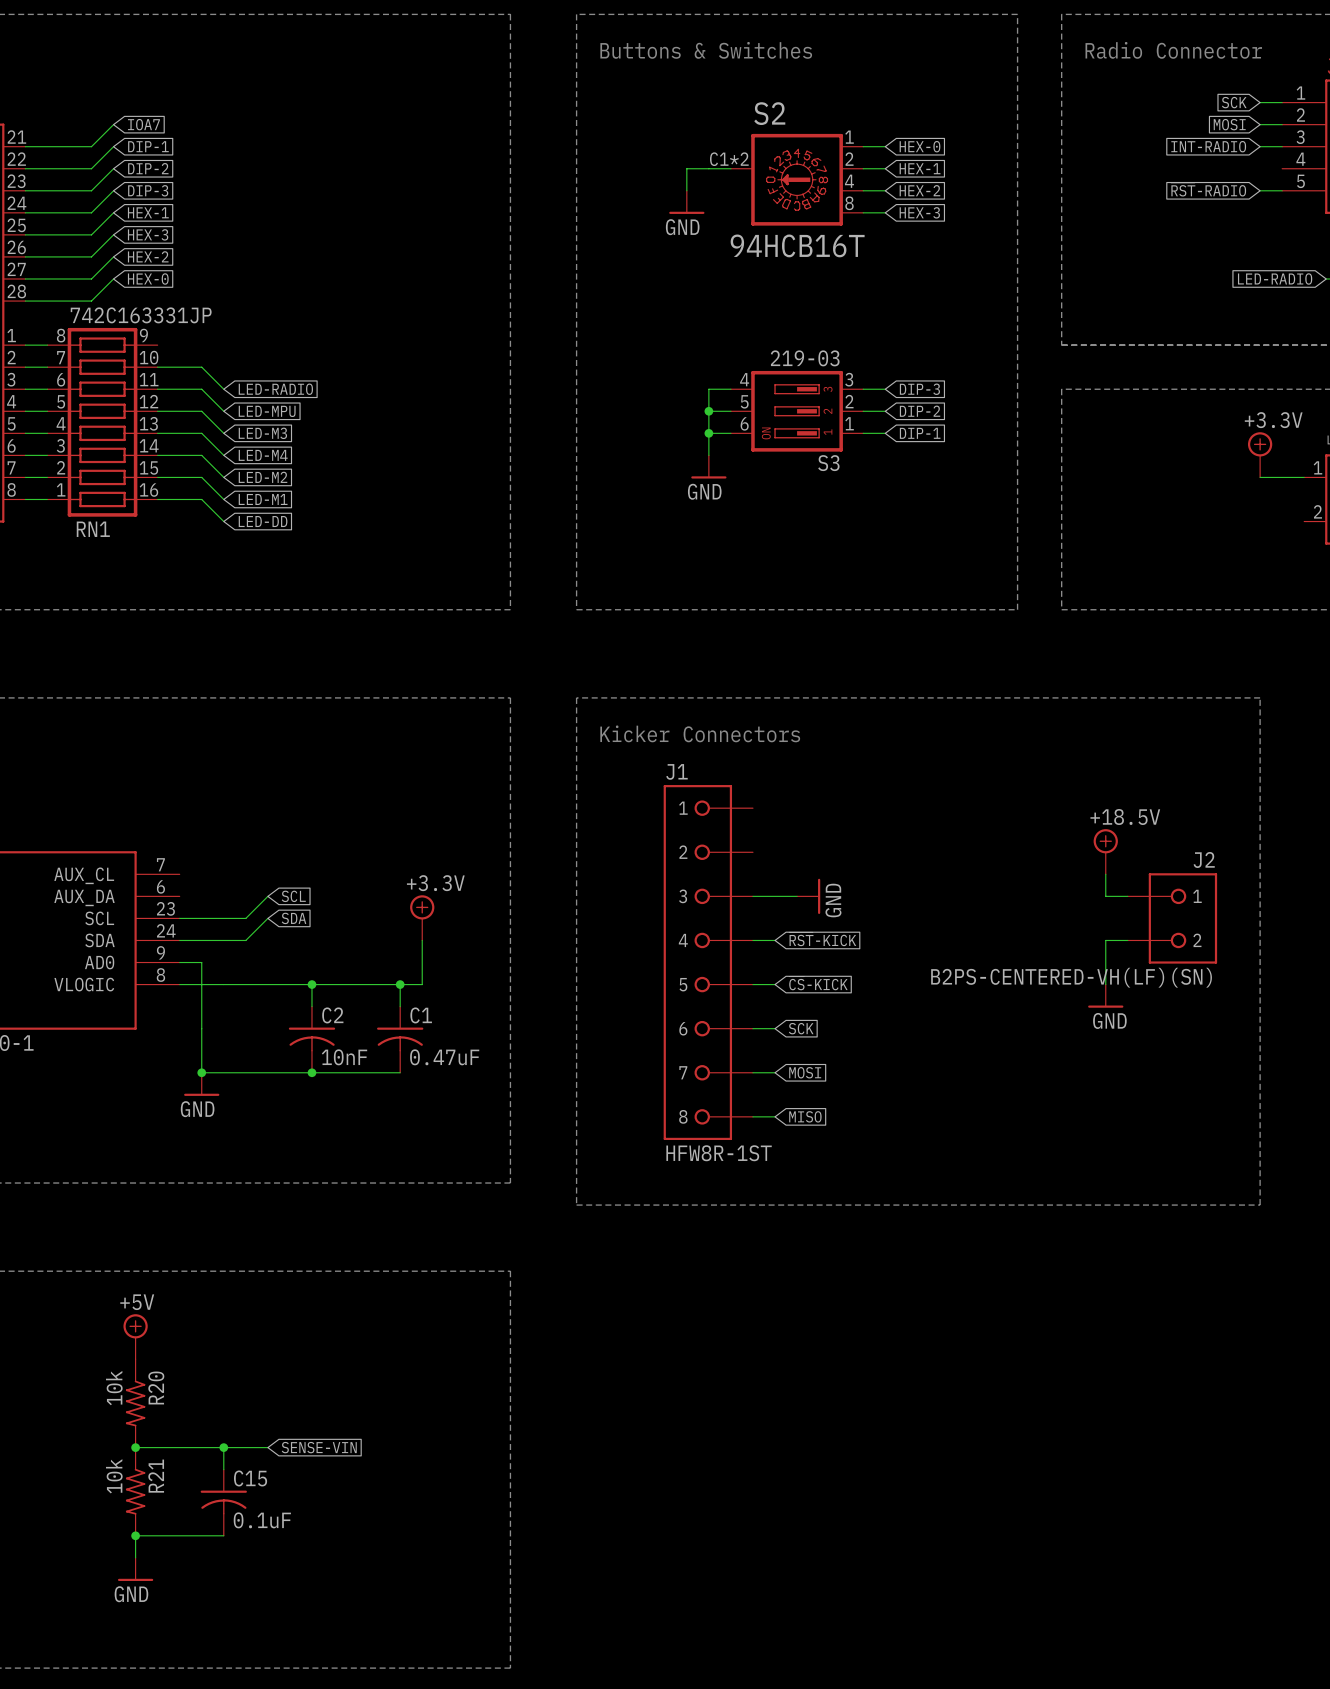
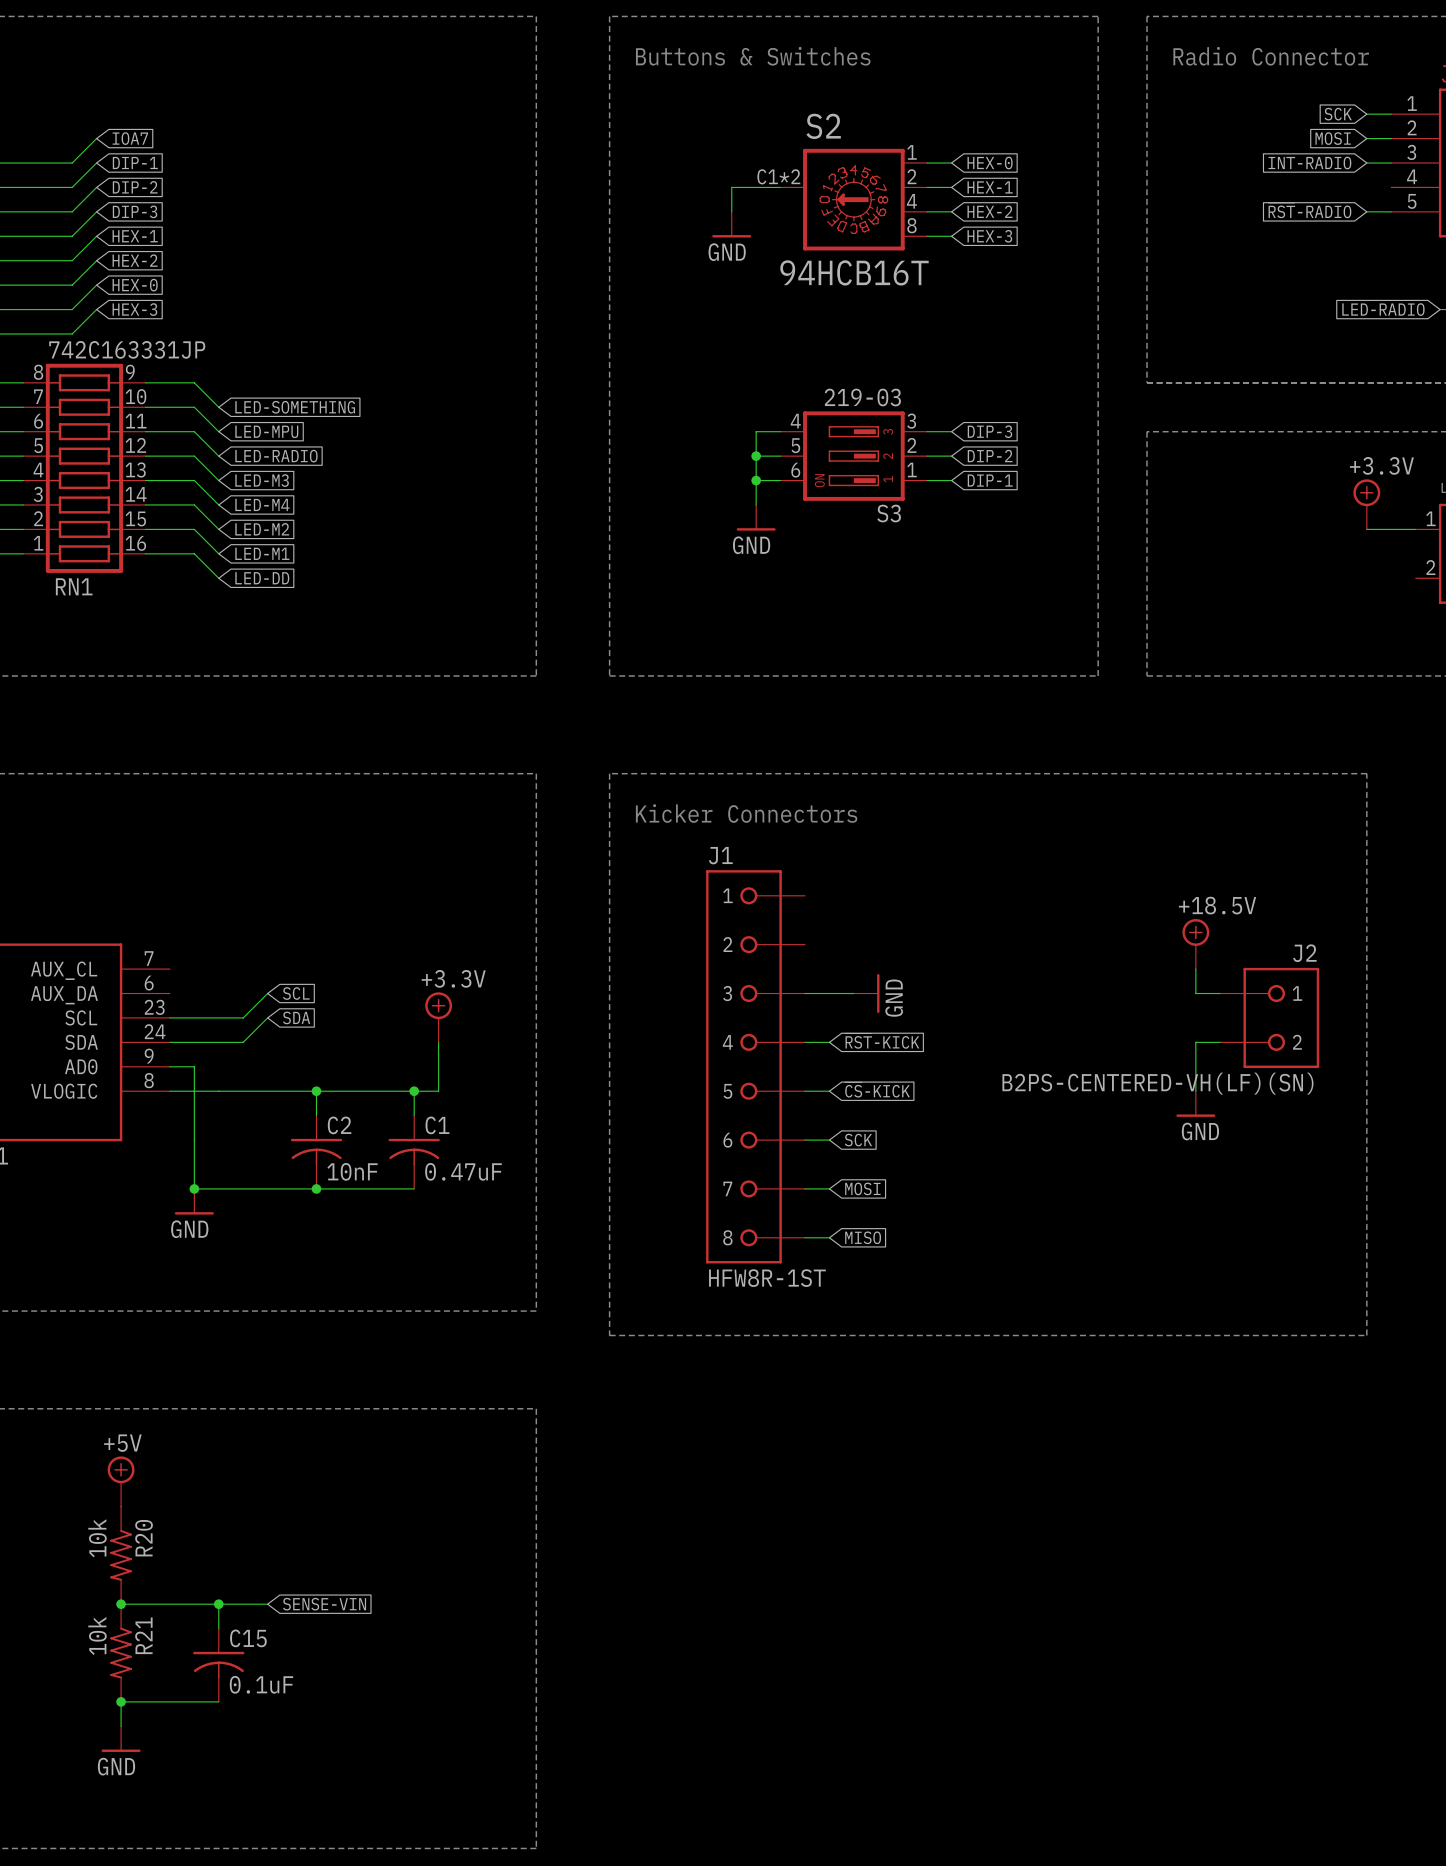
global label: HEX-3 (148, 234) -> HEX-2 (135, 260)
global label: HEX-2 (148, 256) -> HEX-0 (135, 285)
global label: HEX-0 (148, 278) -> HEX-3 (134, 309)
wire: none -> (145, 382) (194, 382) (218, 407)
global label: none -> LED-SOMETHING (295, 407)
global label: LED-RADIO (275, 389) -> LED-MPU (266, 431)
global label: LED-MPU (267, 411) -> LED-RADIO (276, 456)

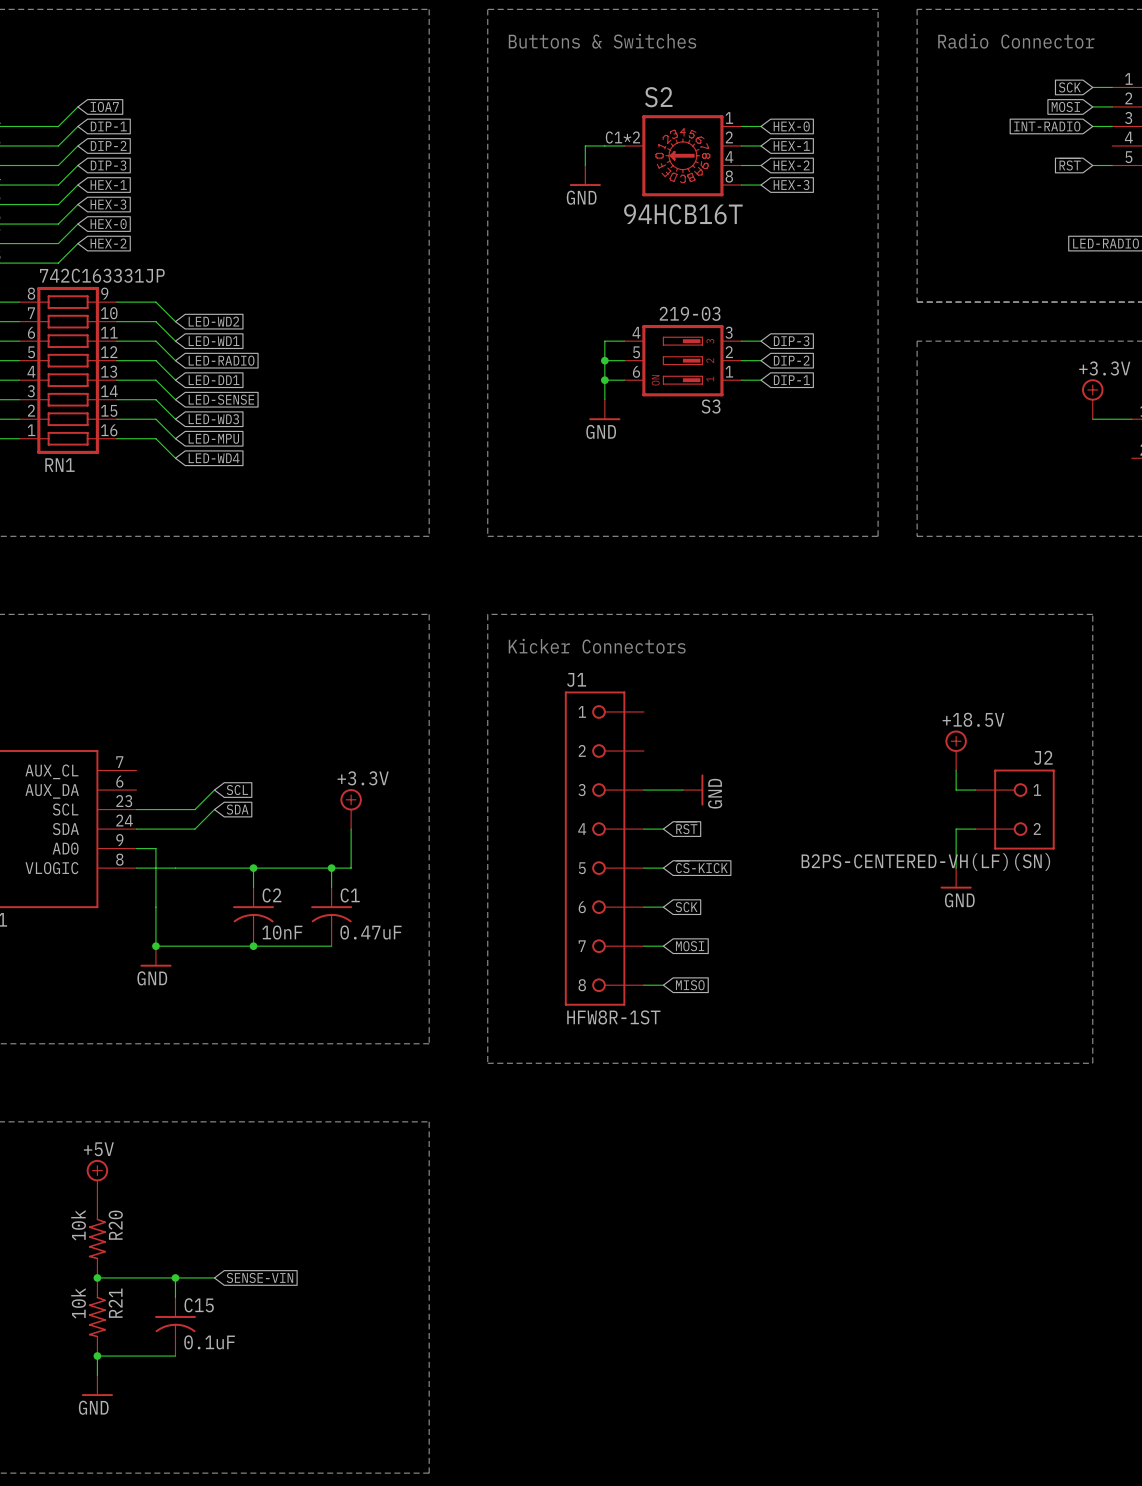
global label: ~{RST}-RADIO (1309, 210) -> ~{RST} (1070, 164)
global label: HEX-2 (135, 260) -> HEX-3 (108, 204)
global label: HEX-3 (134, 309) -> HEX-2 (108, 243)
global label: LED-SOMETHING (295, 407) -> LED-WD2 (213, 321)
global label: LED-MPU (266, 431) -> LED-WD1 (214, 341)
global label: LED-M3 (262, 480) -> LED-DD1 (214, 380)
global label: LED-M4 (262, 504) -> LED-SENSE (221, 399)
global label: LED-M2 (262, 529) -> LED-WD3 (213, 419)
global label: LED-M1 (262, 553) -> LED-MPU (213, 438)
global label: LED-DD (262, 578) -> LED-WD4 (214, 458)
global label: ~{RST}-KICK (882, 1041) -> ~{RST} (686, 828)

